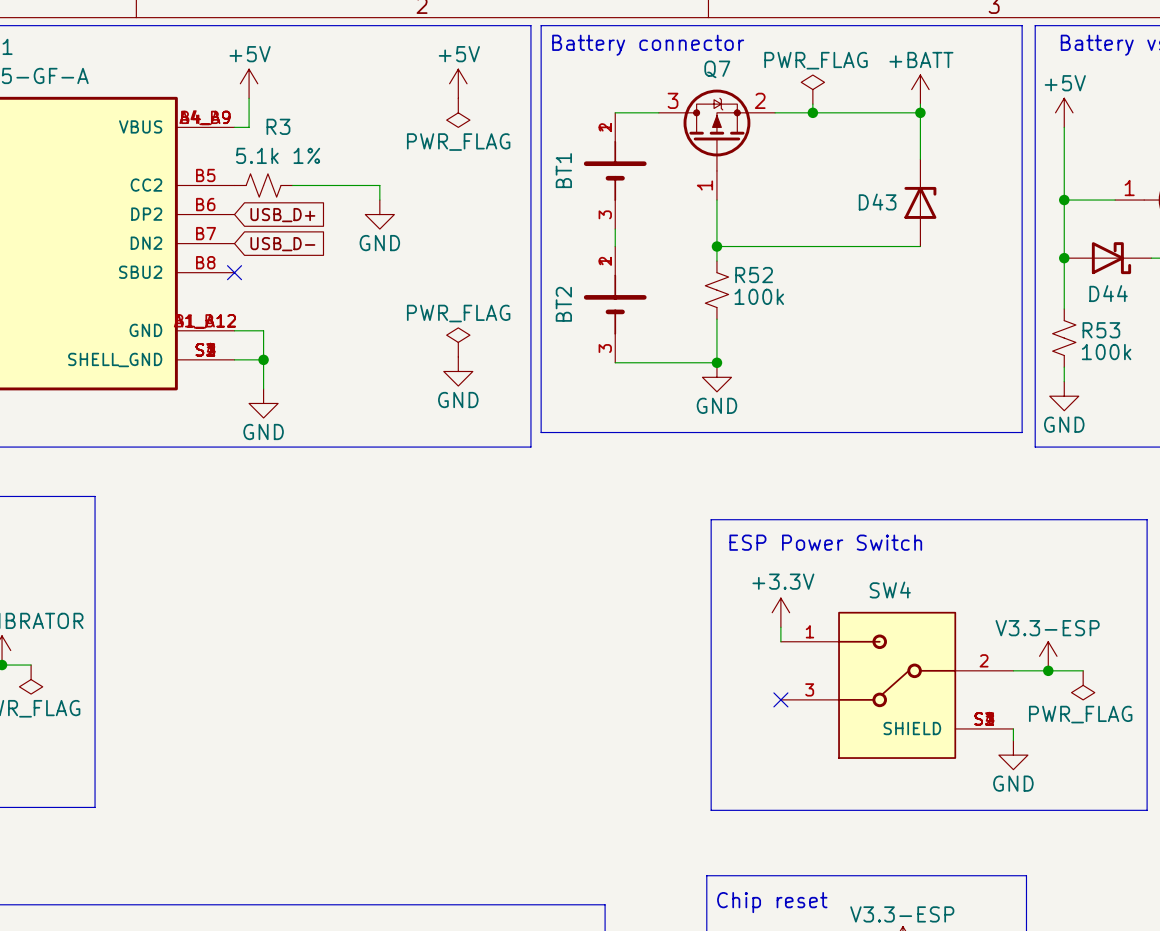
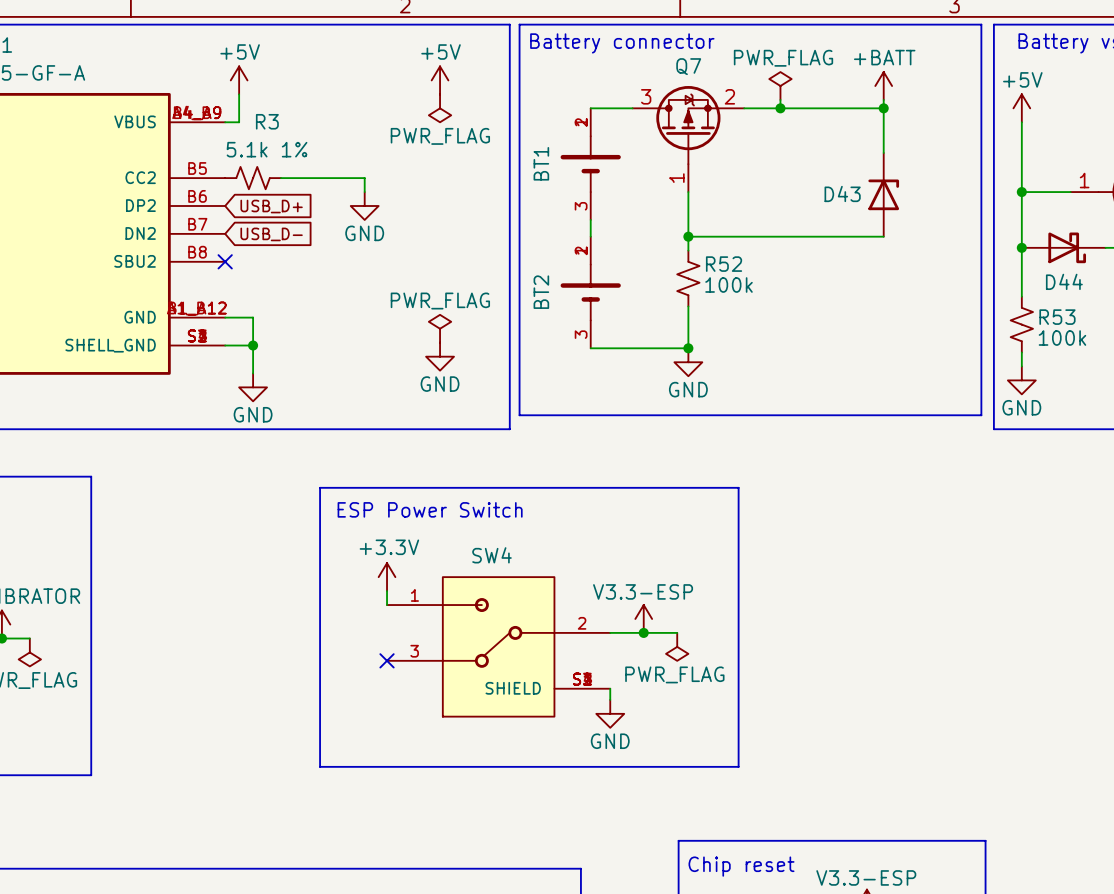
line: none -> (320, 487) (738, 487) (738, 766) (320, 766) (320, 487)
line: (711, 519) (1147, 519) (1147, 810) (711, 810) (711, 519) -> none
text: none -> ESP Power Switch (430, 509)
text: ESP Power Switch (825, 542) -> none
power symbol: none -> +3.3V (387, 577)
power symbol: +3.3V (780, 612) -> none
wire: none -> (387, 591) (387, 605)
wire: (780, 627) (780, 641) -> none
power symbol: none -> V3.3-ESP (643, 618)
power symbol: V3.3-ESP (1048, 656) -> none
wire: none -> (610, 632) (677, 632)
junction: none -> (643, 632)
wire: (1013, 670) (1083, 670) -> none
junction: (1048, 670) -> none
power symbol: none -> PWR_FLAG (677, 646)
SW4 position: (897, 685) -> (498, 646)
power symbol: PWR_FLAG (1083, 685) -> none
no-connect mark: none -> (387, 660)
no-connect mark: (780, 699) -> none
wire: none -> (610, 688) (610, 699)
wire: (1013, 728) (1013, 740) -> none
power symbol: none -> GND (610, 713)
power symbol: GND (1013, 755) -> none

